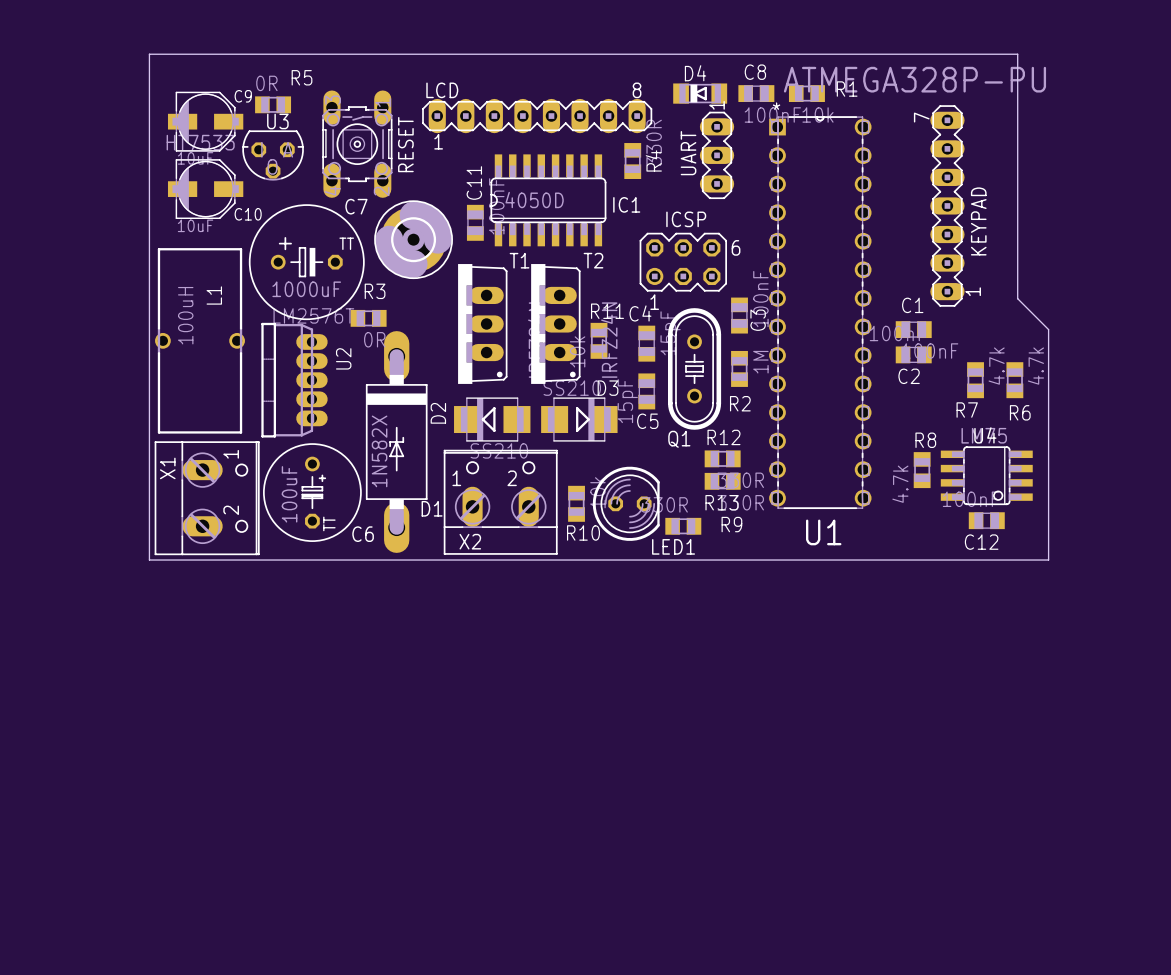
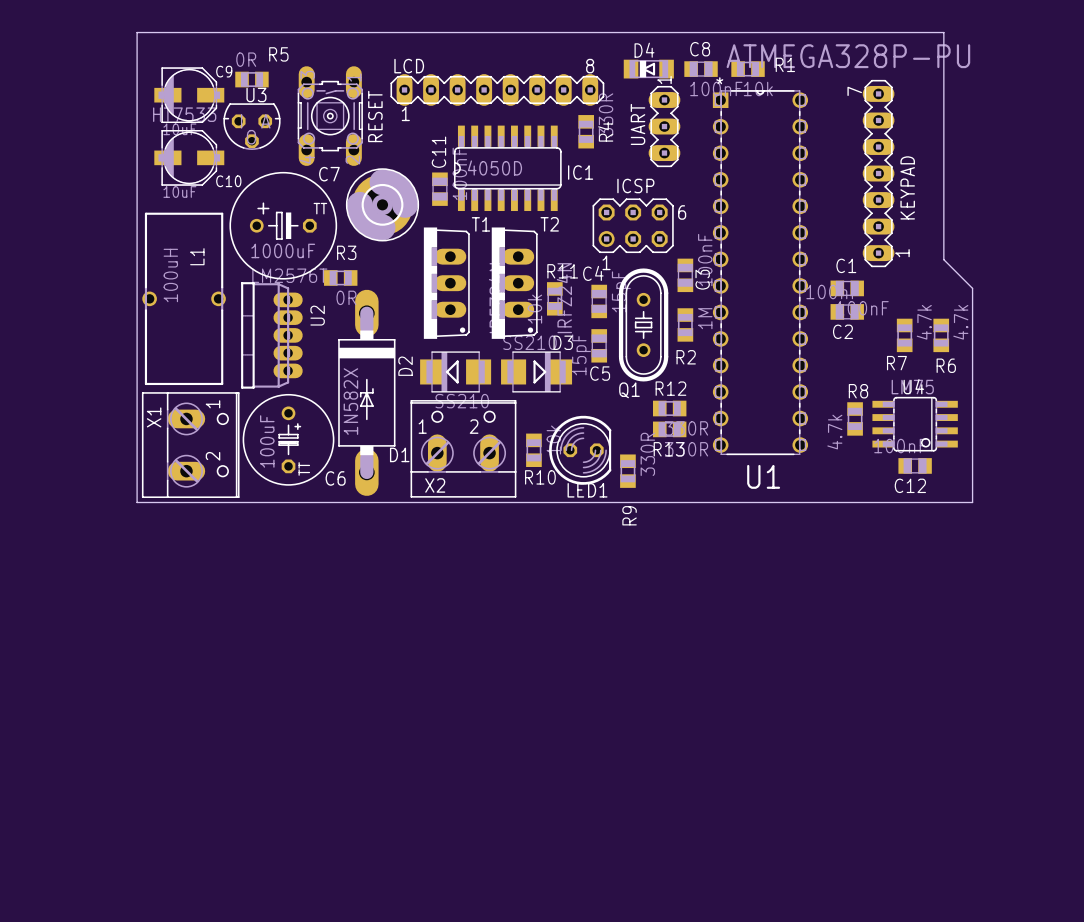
R9 rotation: 0° (683, 526) -> 90° clockwise (627, 471)
LED1 name position: LED1 (673, 546) -> LED1 (587, 490)

